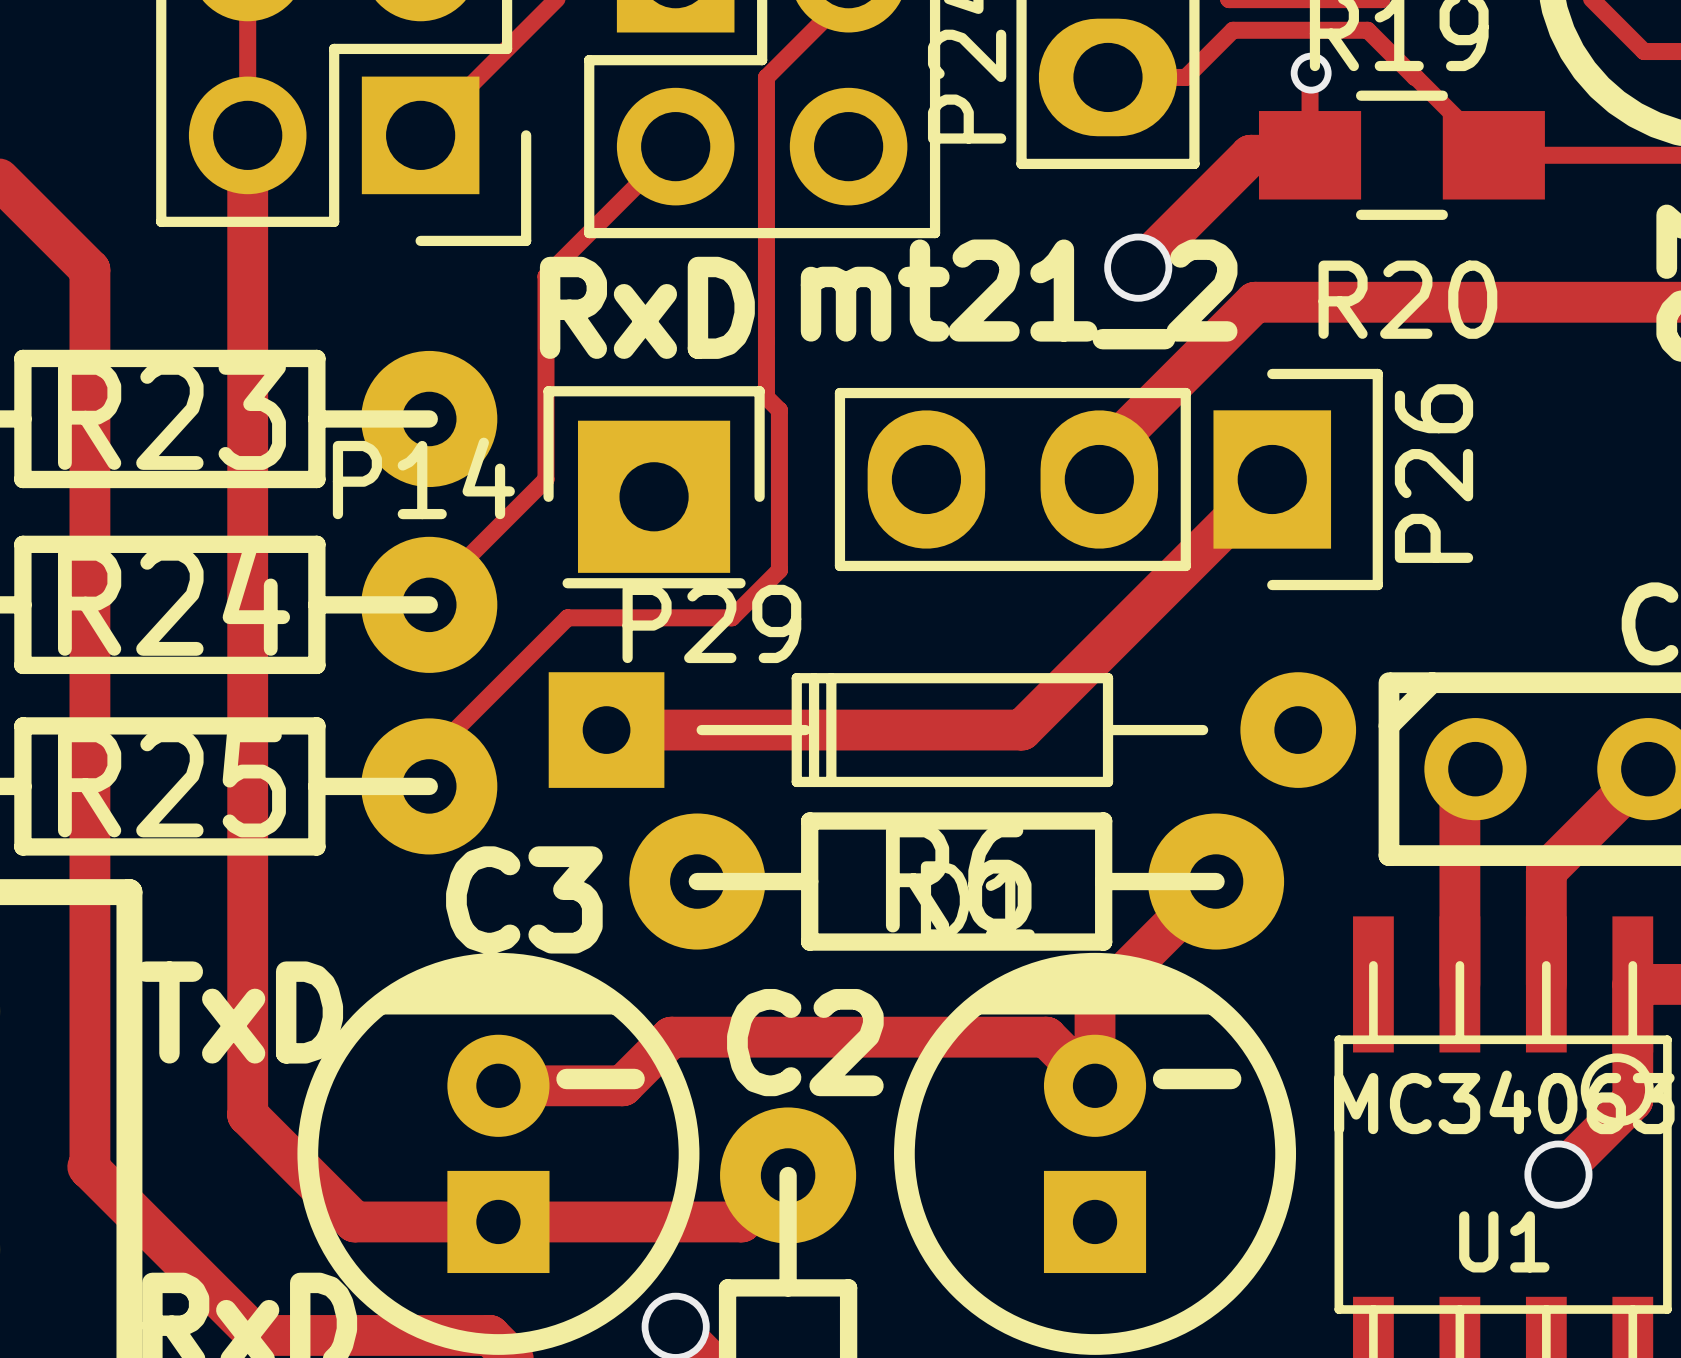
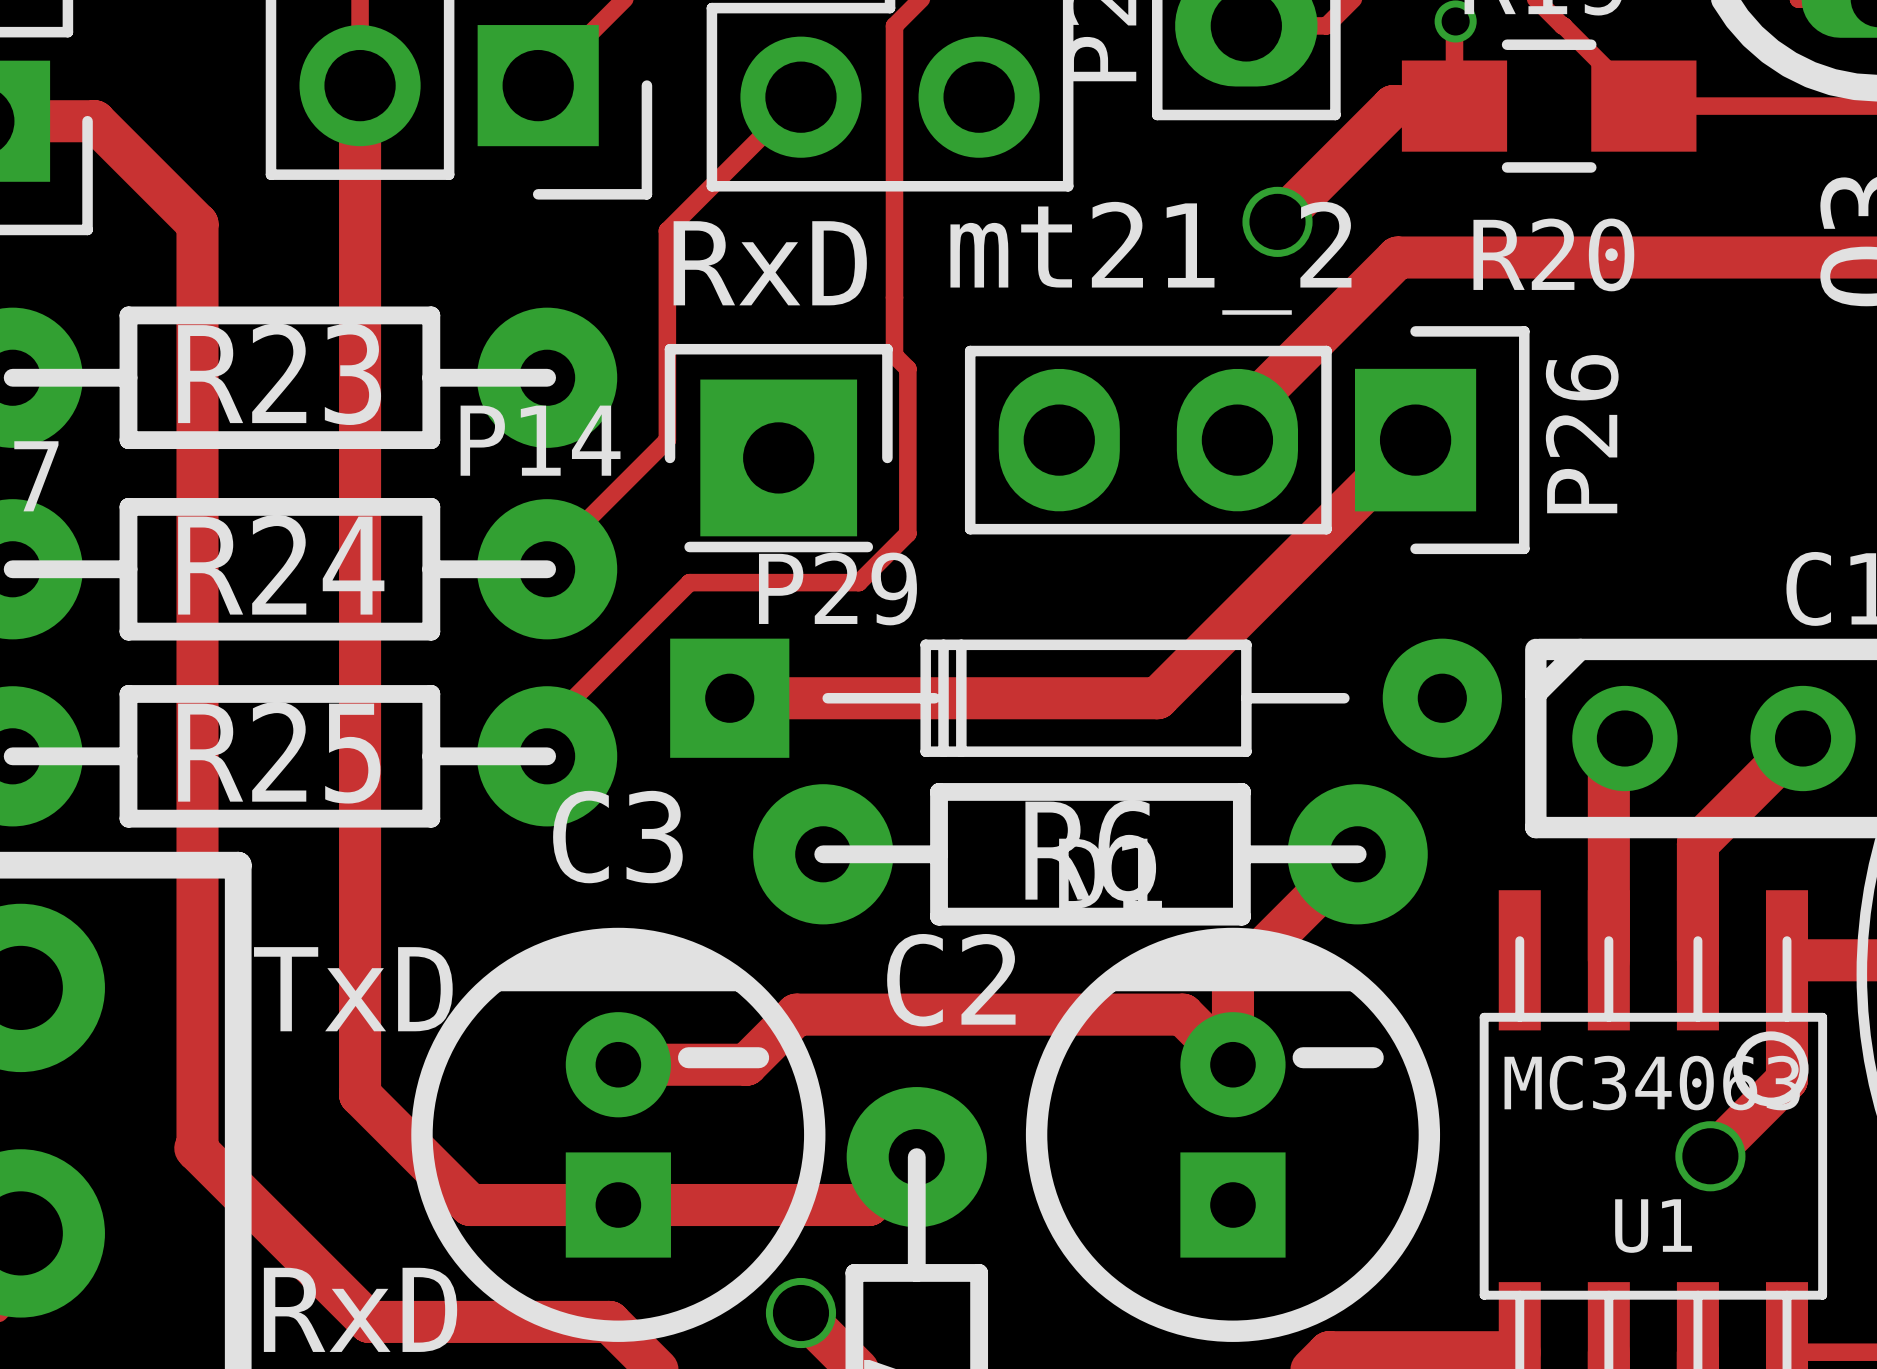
C3 name position: C3 (524, 899) -> C3 (617, 837)
C2 name position: C2 (805, 1042) -> C2 (951, 980)

